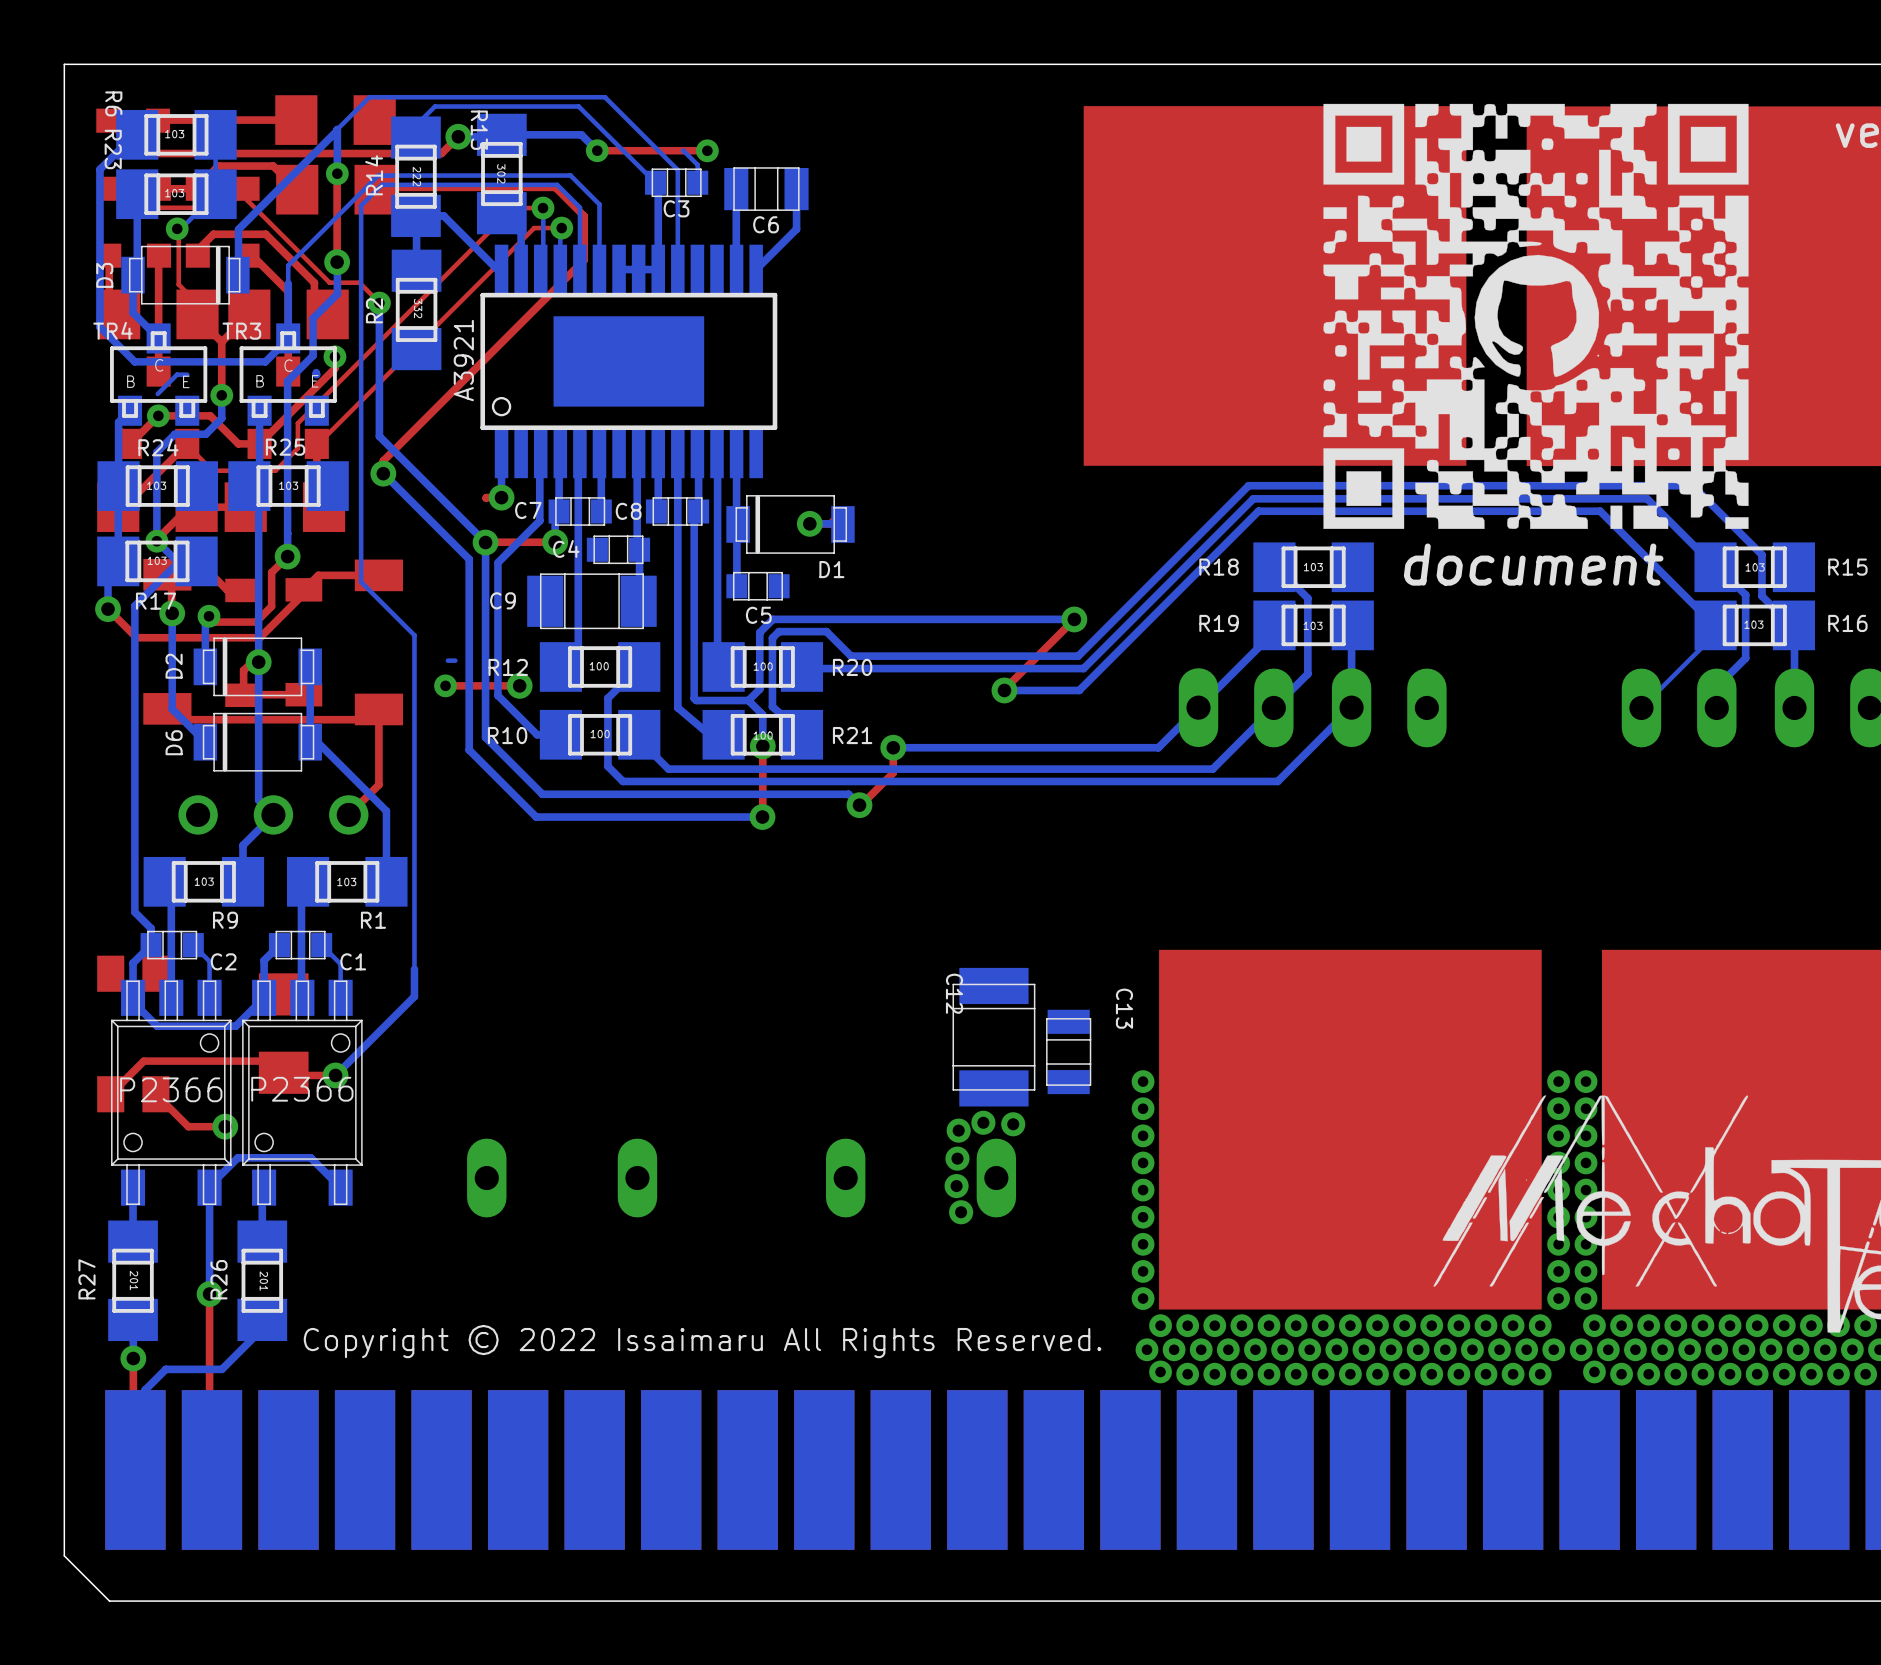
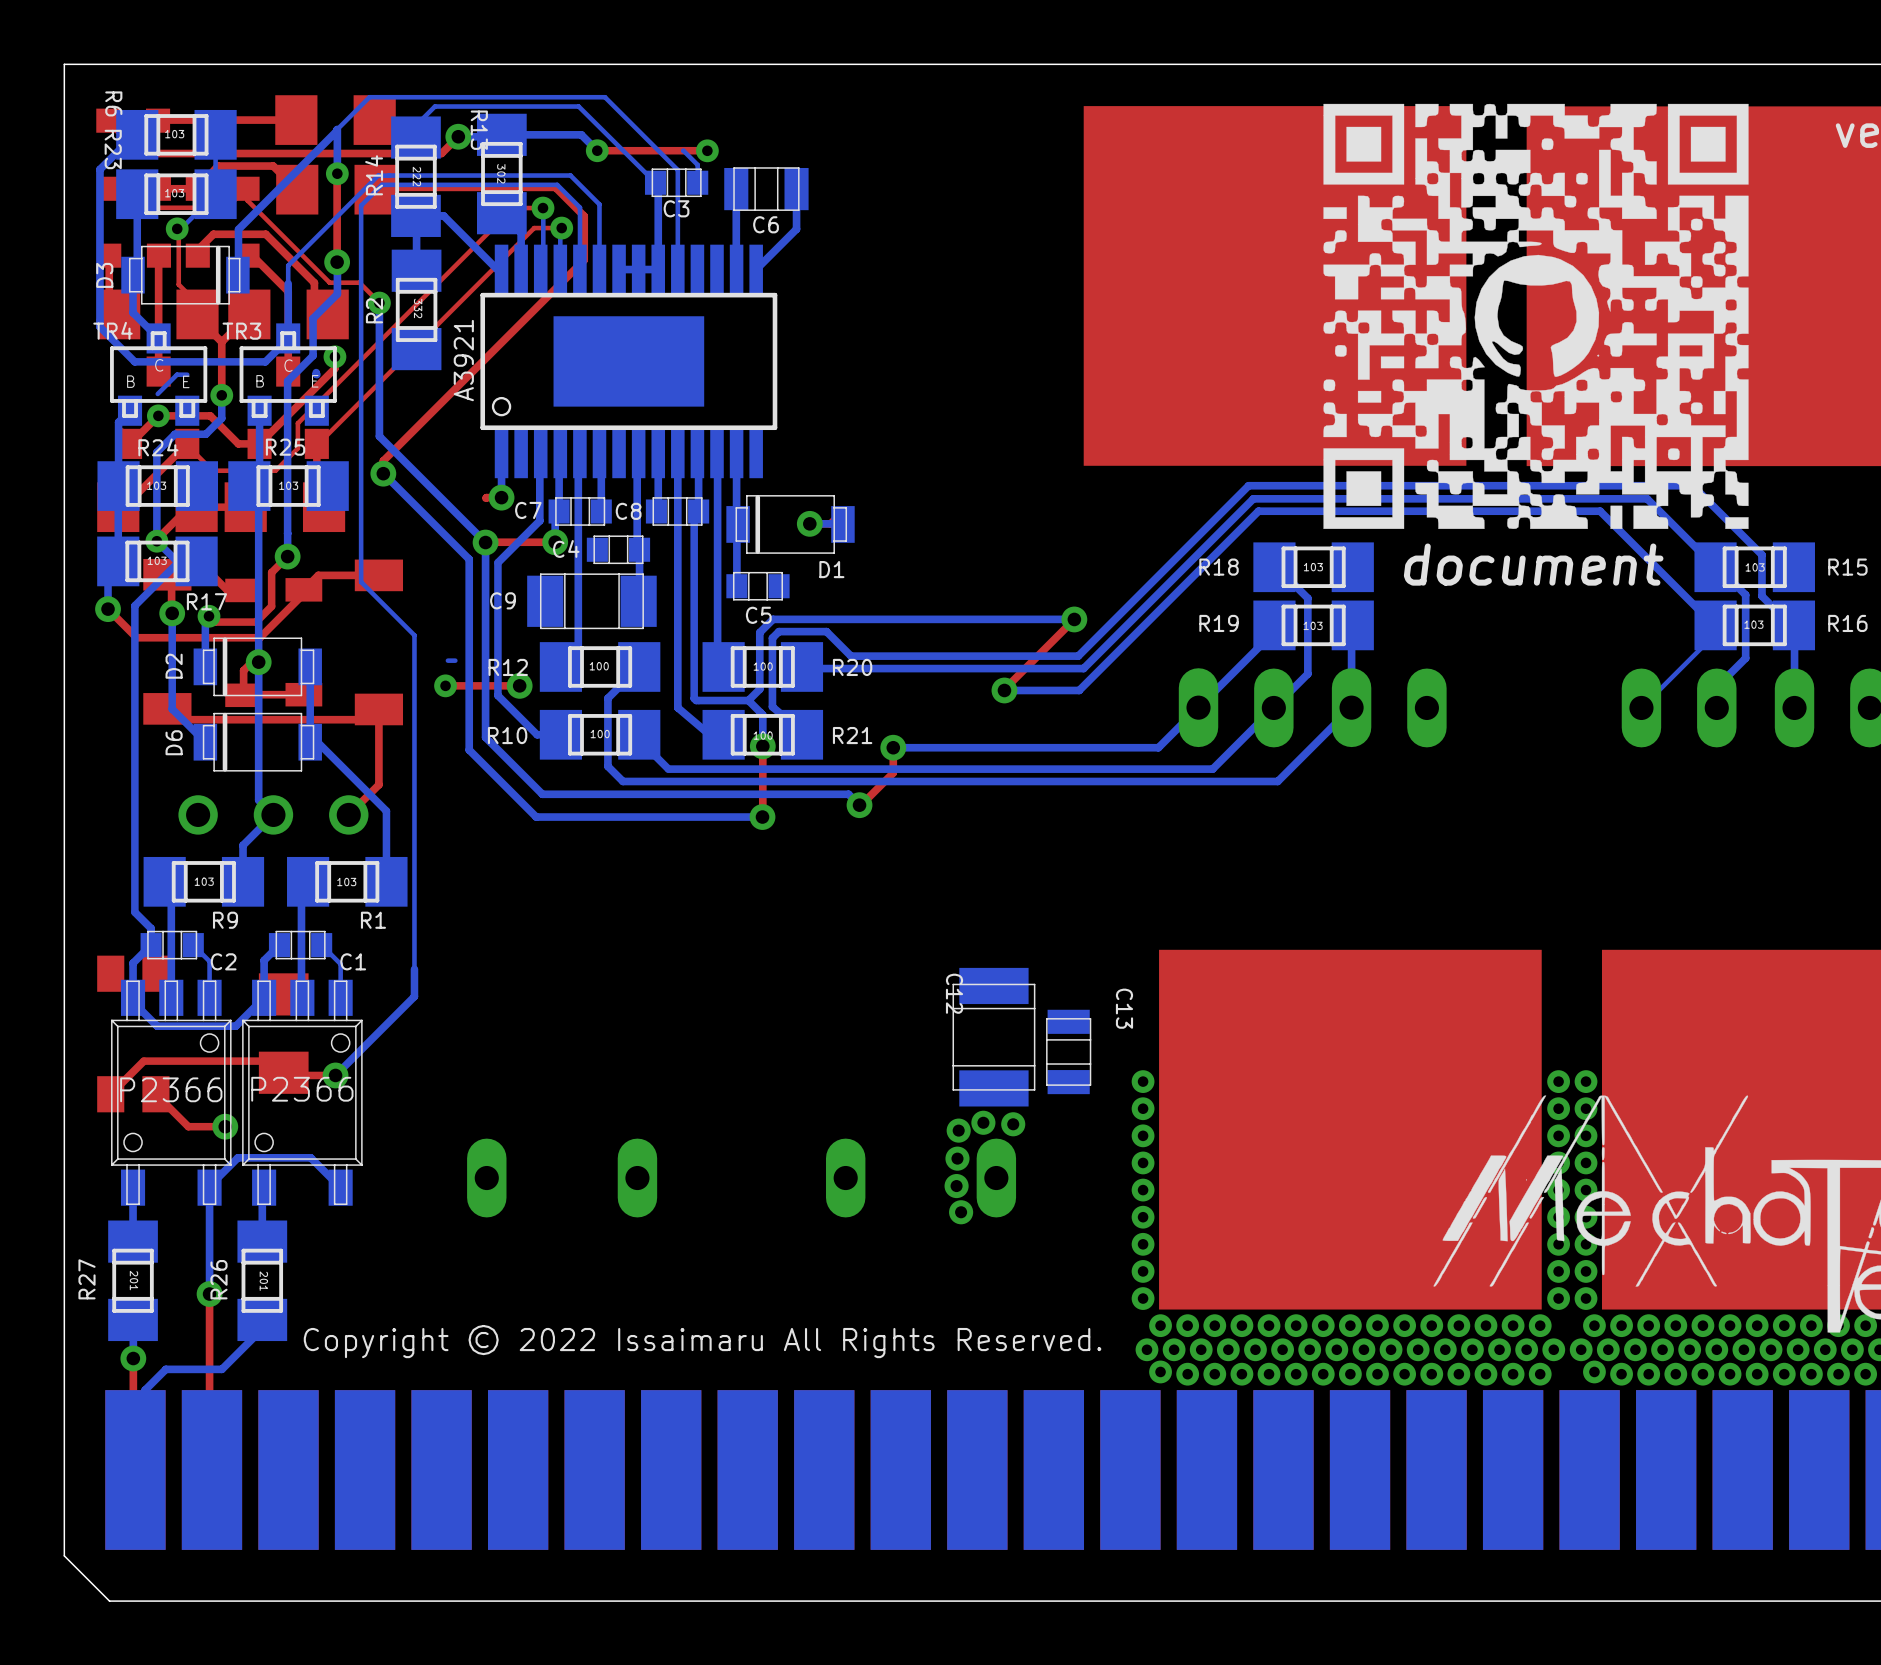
R17 name position: R17 (156, 601) -> R17 (206, 601)

